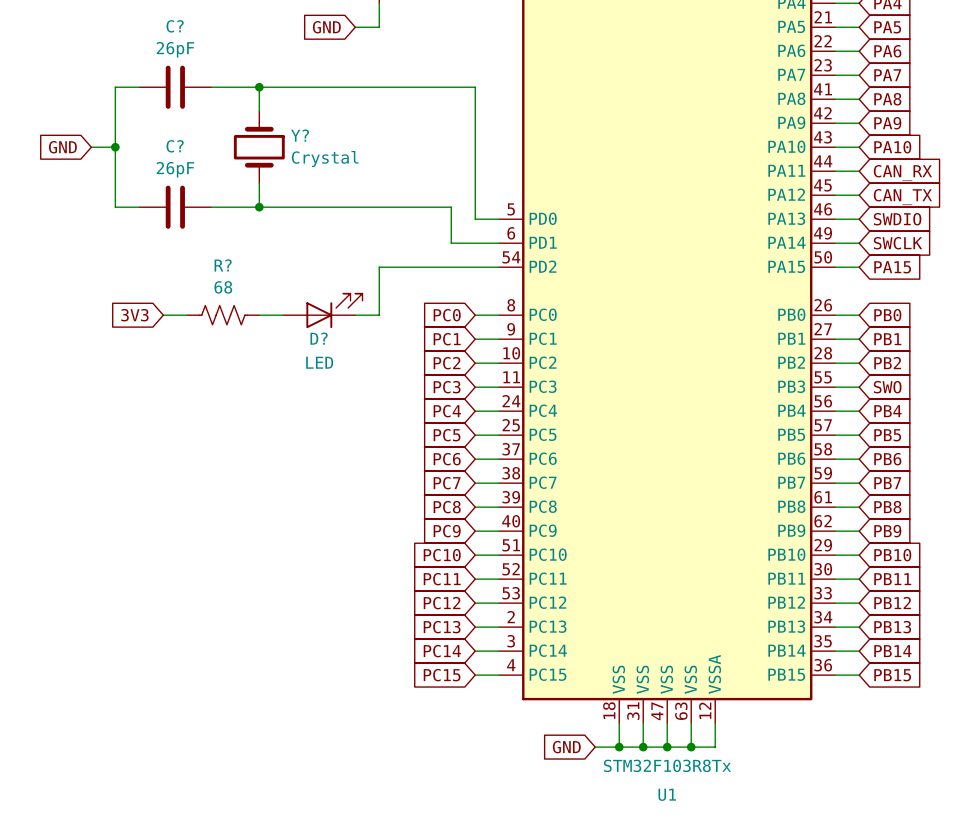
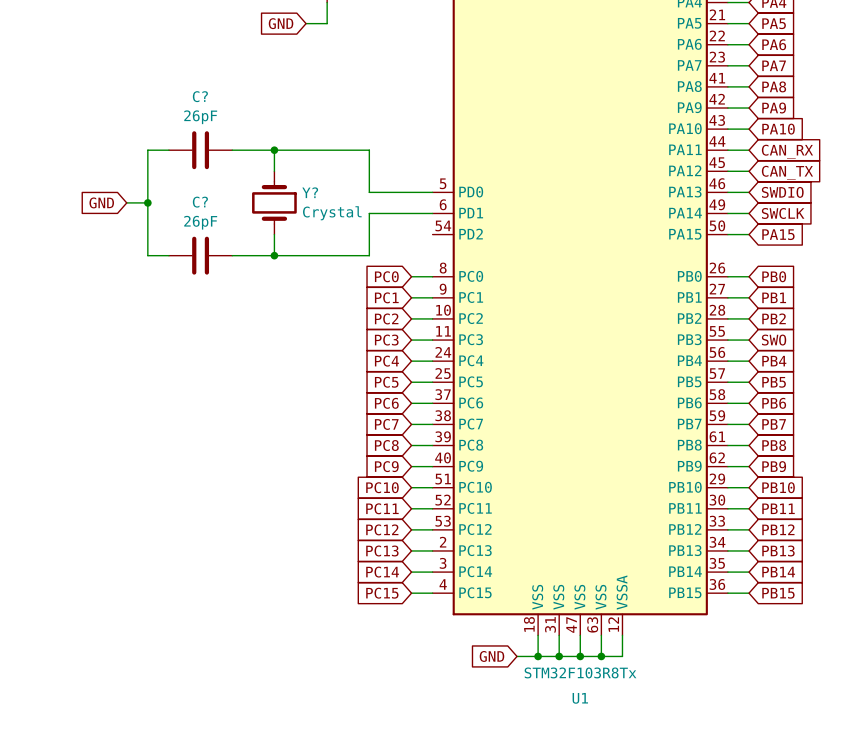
wire: (139, 87) (115, 87) (115, 207) (139, 207) -> (168, 150) (147, 150) (147, 255) (168, 255)
C?: 26pF (175, 87) -> none
wire: (211, 87) (475, 87) (475, 219) -> (232, 150) (369, 150) (369, 192) (411, 192)
wire: (259, 87) (259, 111) -> (274, 150) (274, 171)
junction: (259, 87) -> none
global label position: GND (62, 147) -> GND (101, 202)
wire: (91, 147) (115, 147) -> (126, 202) (147, 202)
junction: (115, 147) -> none
Y? position: (259, 147) -> (274, 202)
C?: none -> 26pF (200, 150)
junction: none -> (274, 150)
wire: (259, 183) (259, 207) -> (274, 234) (274, 255)
C?: 26pF (175, 207) -> none
wire: (211, 207) (451, 207) (451, 243) -> (232, 255) (369, 255) (369, 213) (390, 213)
junction: (259, 207) -> none
junction: none -> (147, 202)
wire: (499, 267) (379, 267) (379, 315) (355, 315) -> none
C?: none -> 26pF (200, 255)
junction: none -> (274, 255)
D?: LED (322, 310) -> none
global label: 3V3 (134, 315) -> none
wire: (163, 315) (187, 315) -> none
R?: 68 (223, 315) -> none
wire: (259, 315) (283, 315) -> none

